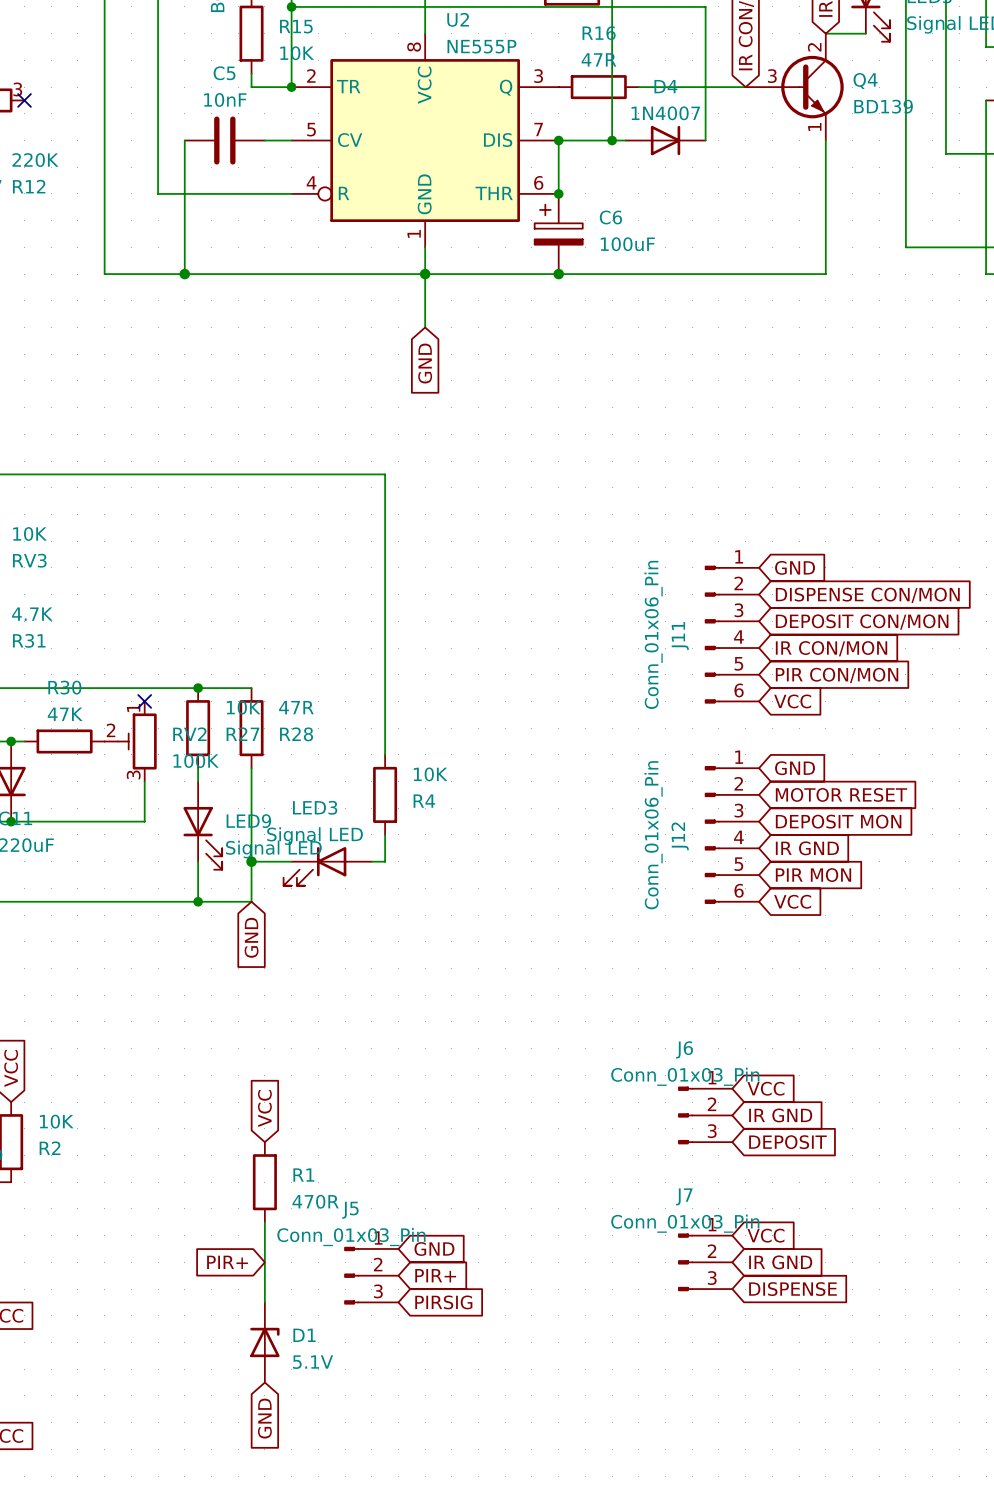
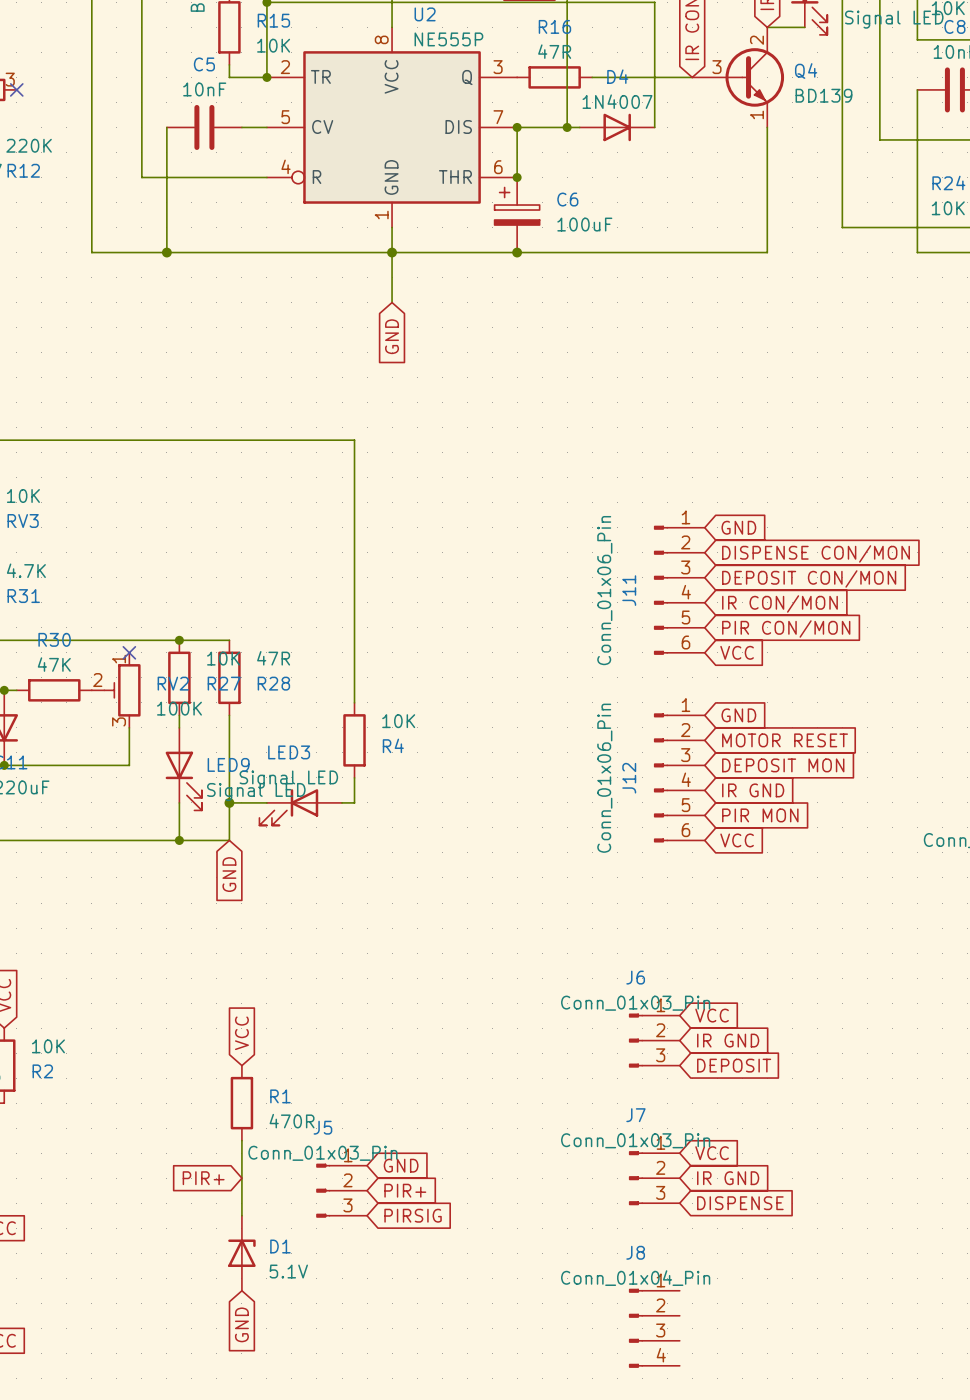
J8: none -> Conn_01x04_Pin (654, 1328)

